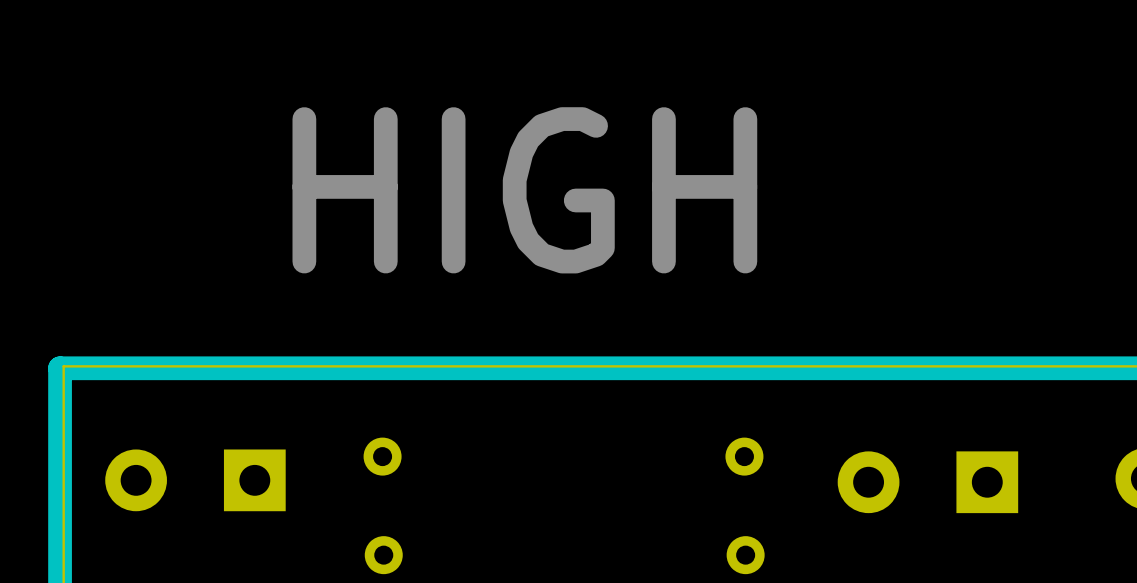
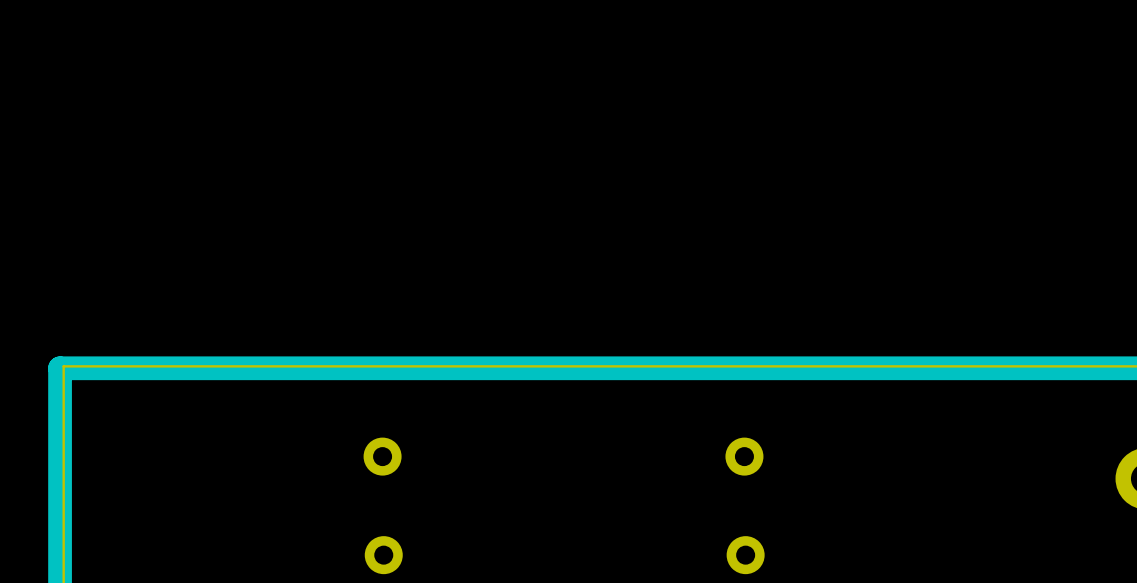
text: HIGH (524, 190) -> none
part: (195, 480) -> none
part: (927, 482) -> none

